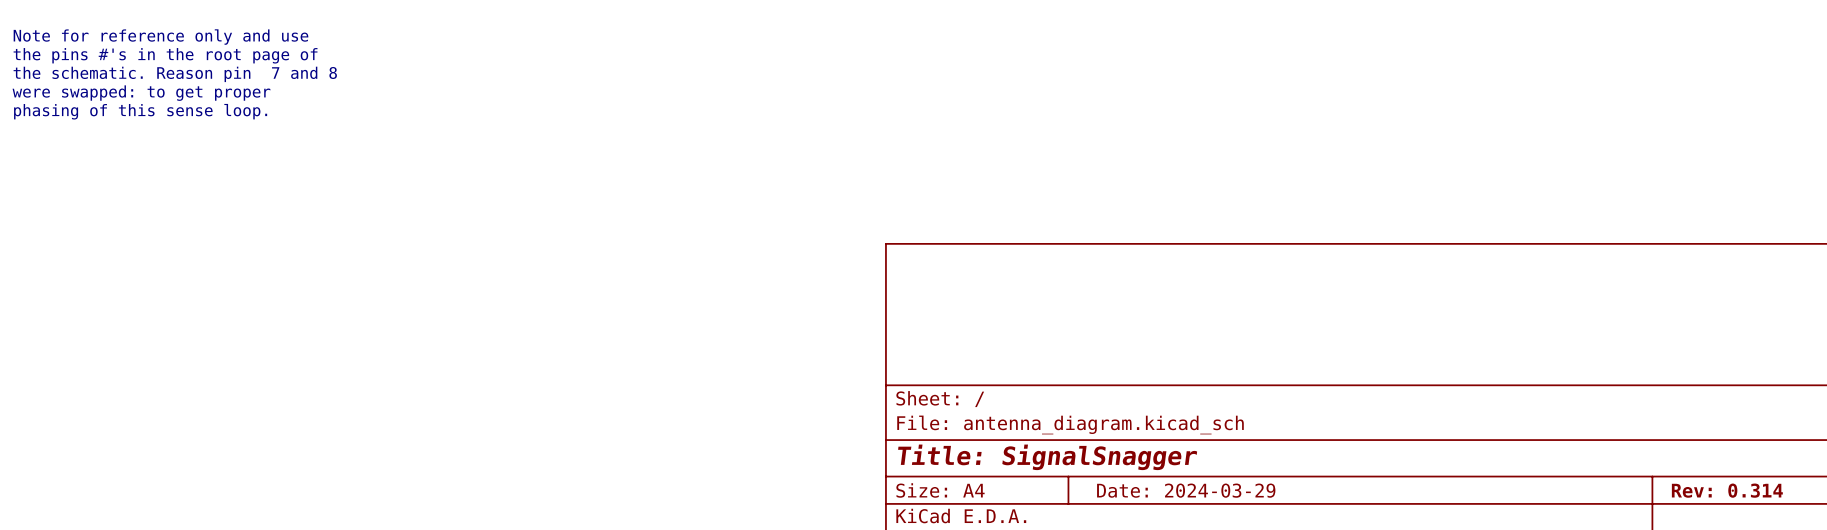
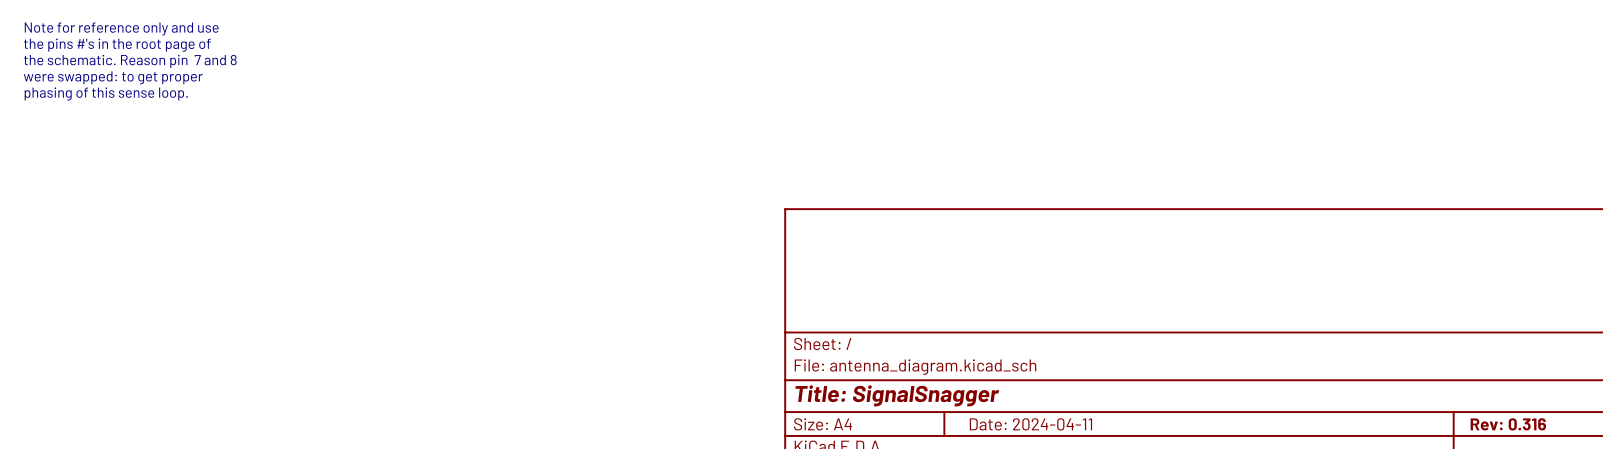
title block: Date: 2024-03-29 (1186, 490) -> Date: 2024-04-11 (1030, 424)
title block: Rev: 0.314 (1727, 490) -> Rev: 0.316 (1508, 424)

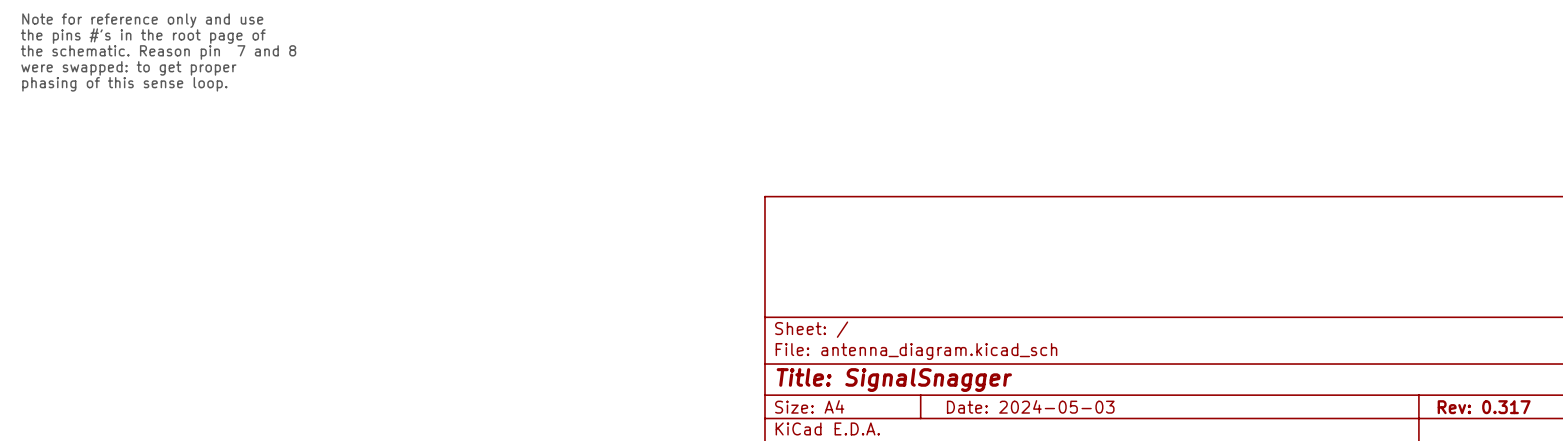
title block: Date: 2024-04-11 (1030, 424) -> Date: 2024-05-03 (1030, 406)
title block: Rev: 0.316 (1508, 424) -> Rev: 0.317 (1484, 407)

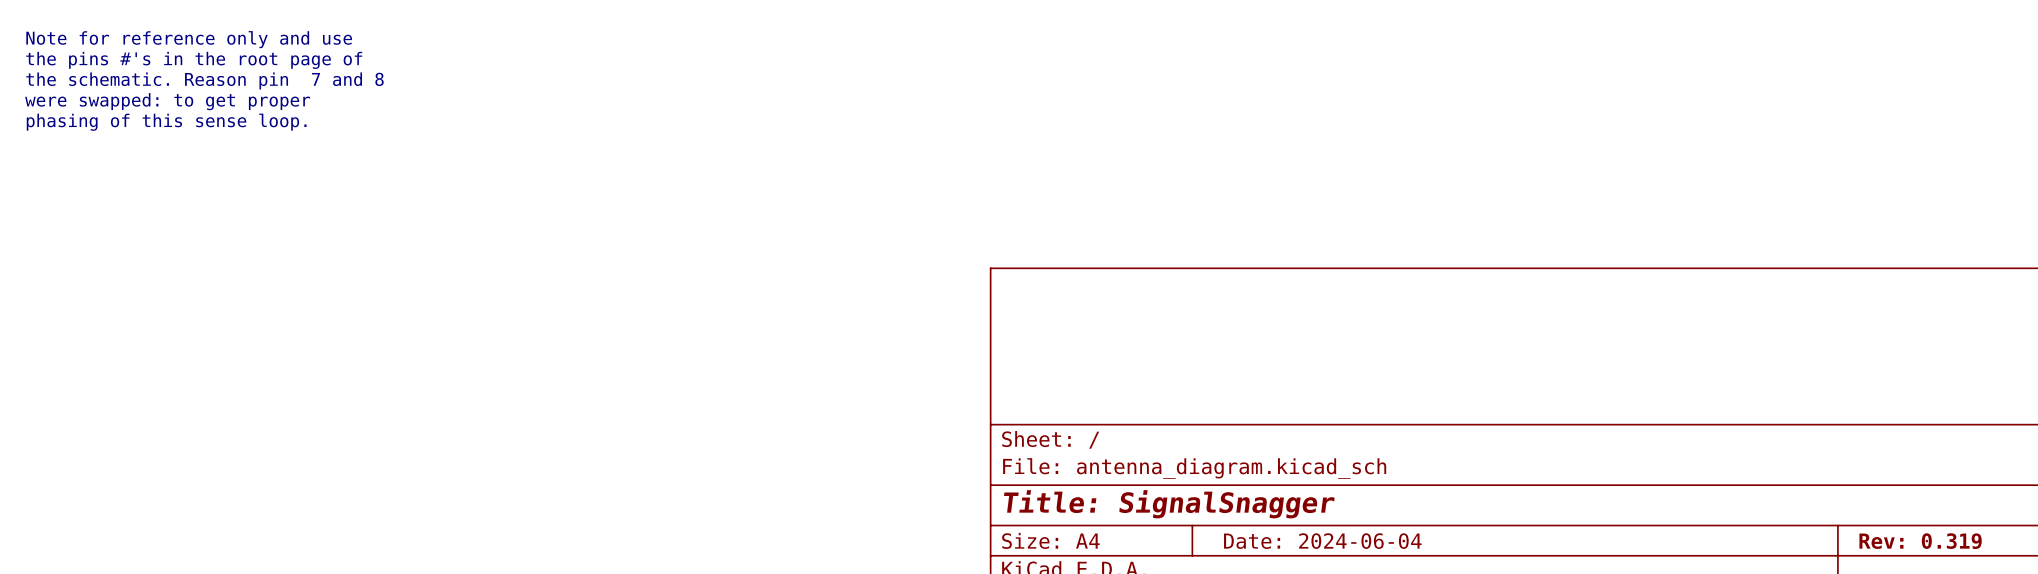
title block: Date: 2024-05-03 (1030, 406) -> Date: 2024-06-04 (1322, 541)
title block: Rev: 0.317 (1484, 407) -> Rev: 0.319 (1920, 541)

